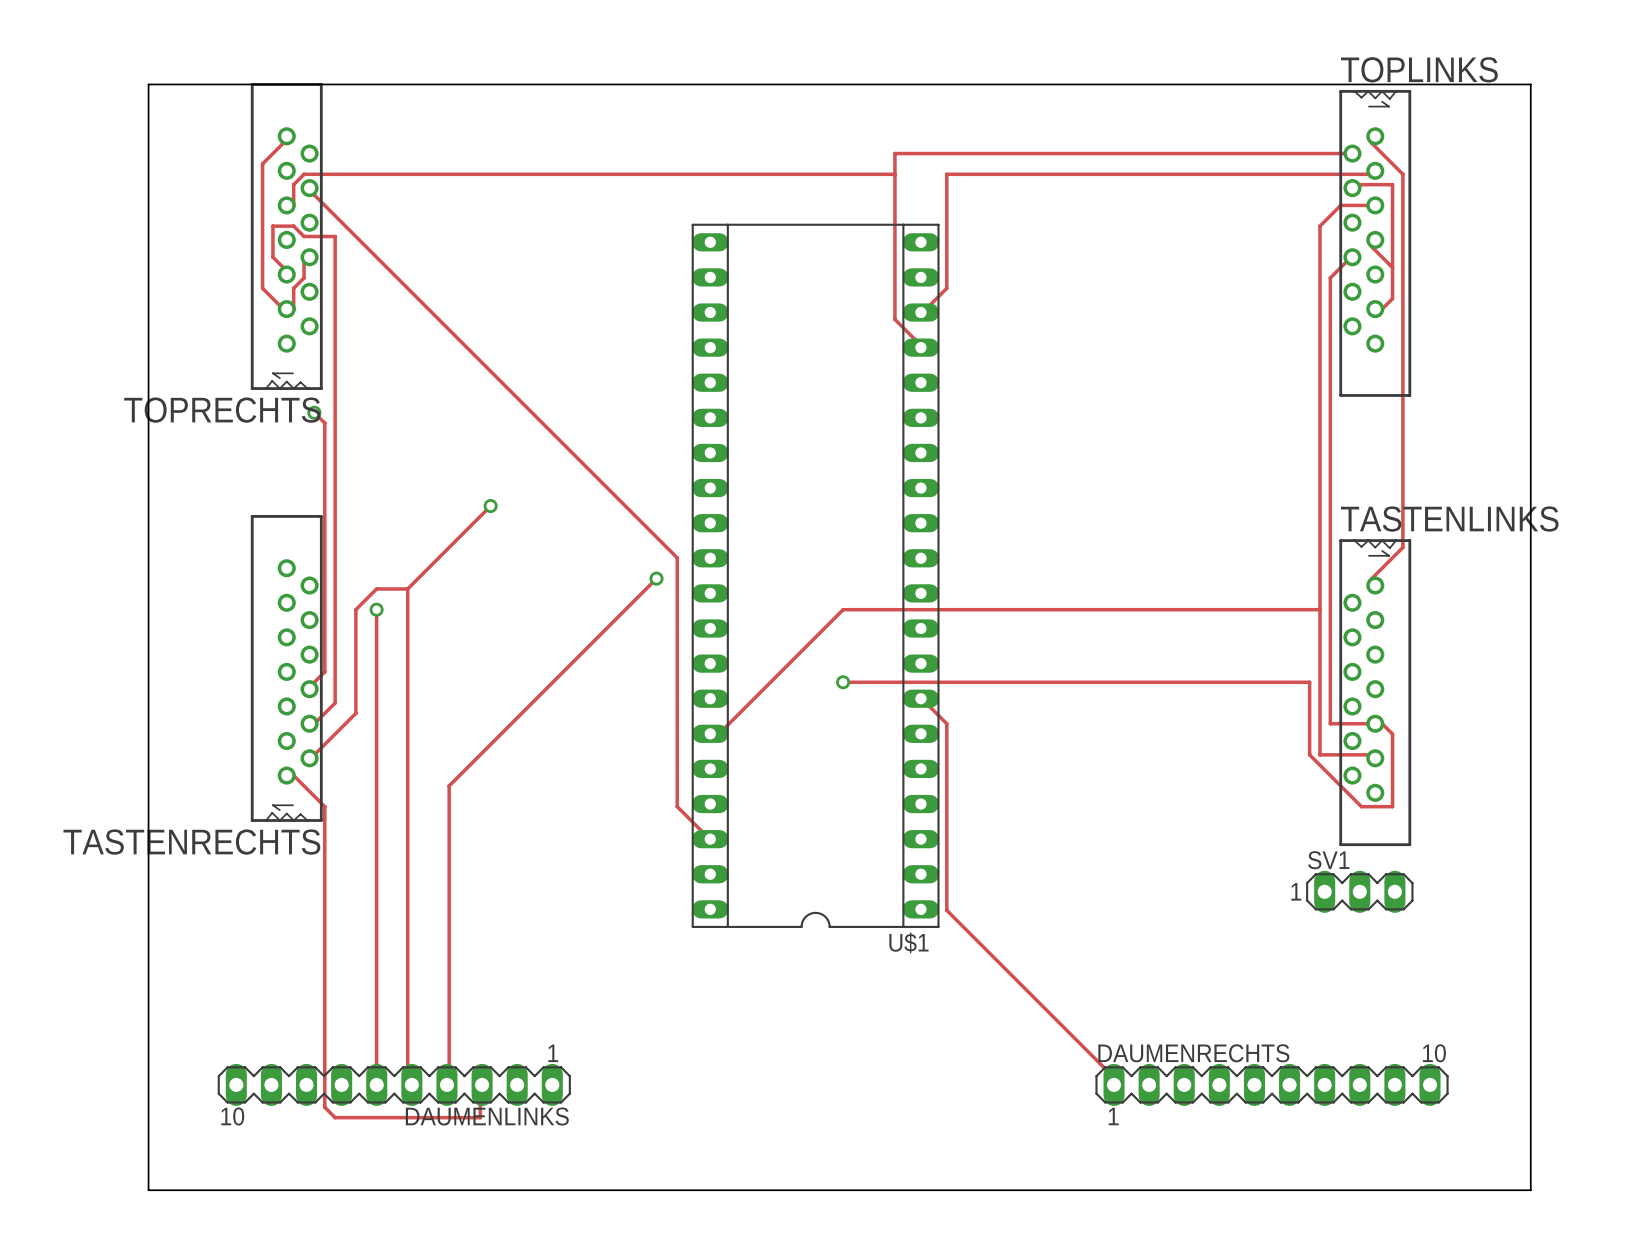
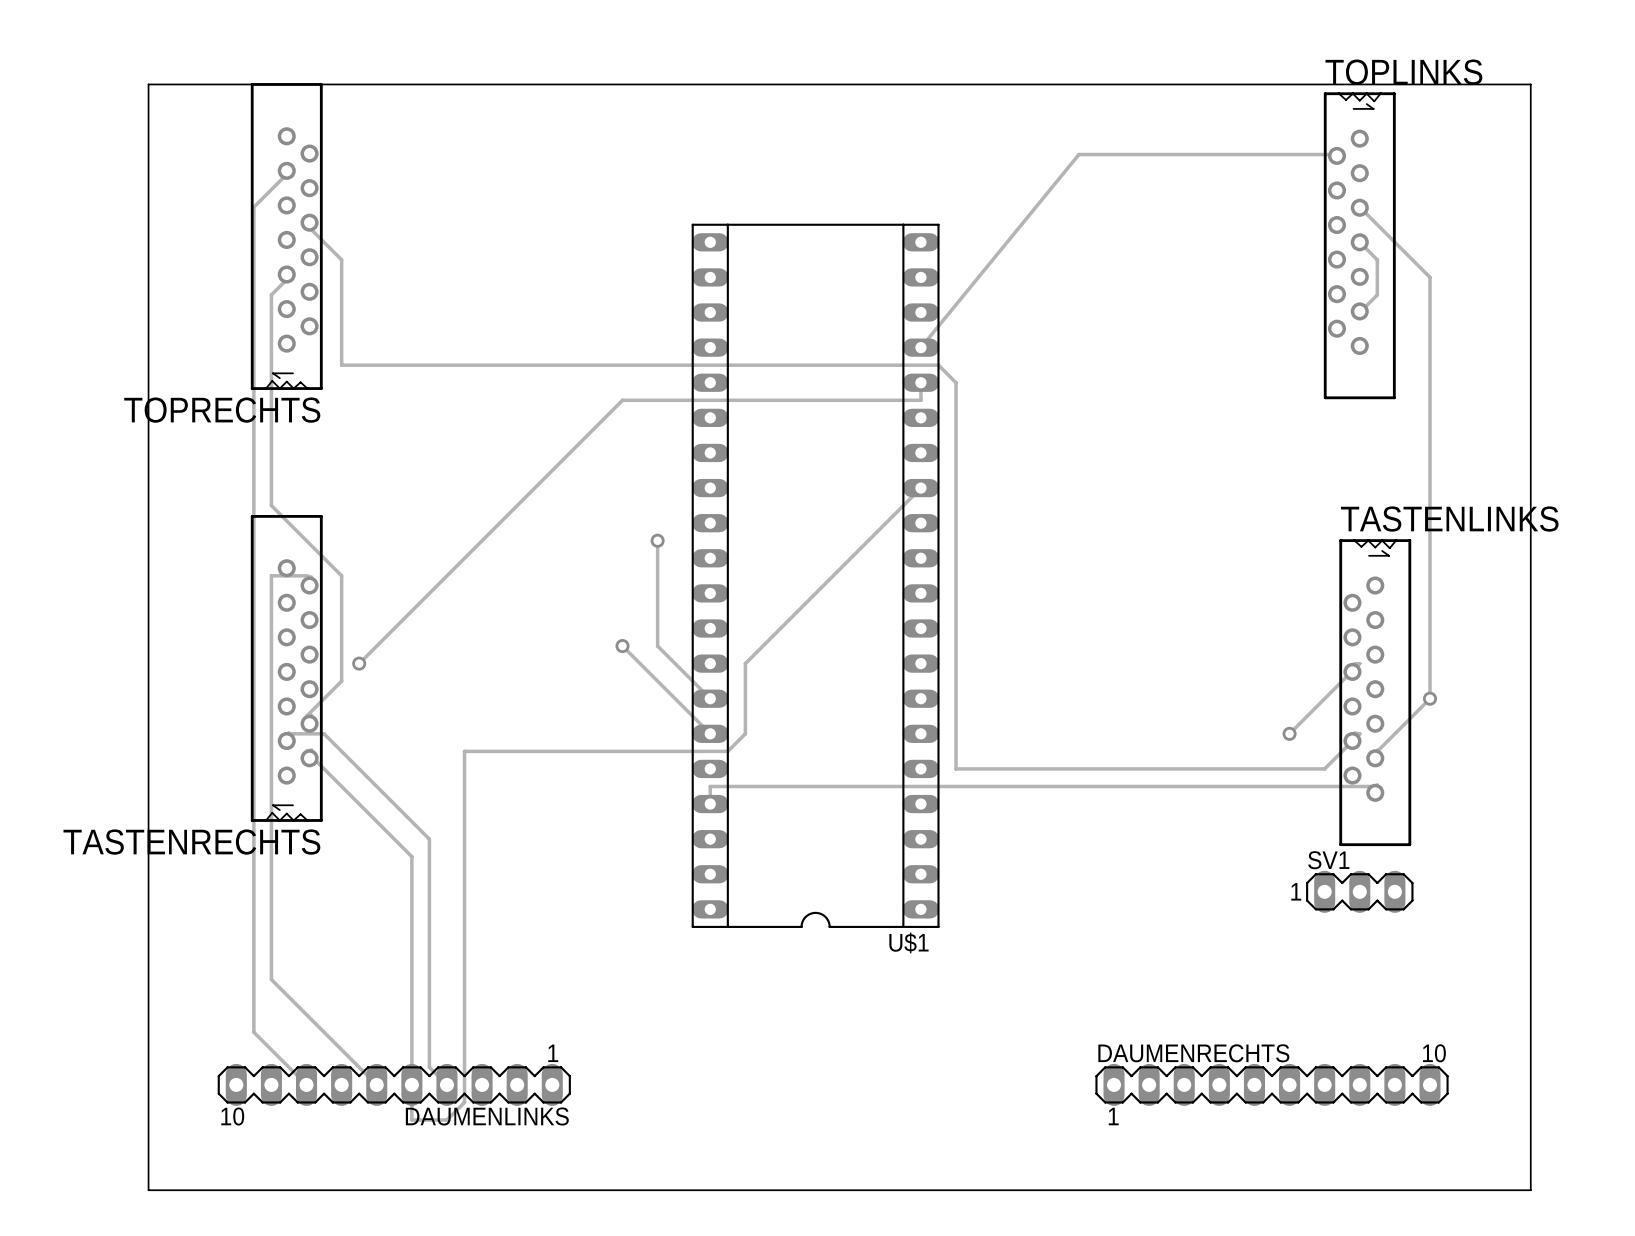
track: (286, 136) (283, 143) (262, 163) (262, 288) (283, 309) (293, 309) (293, 288) (304, 277) (304, 257) (309, 257) -> none
track: (1375, 136) (1371, 143) (1402, 174) (1402, 547) (1371, 578) (1375, 585) -> none
track: (1352, 153) (894, 153) (894, 319) (920, 347) -> (1336, 155) (1342, 154) (1078, 154) (920, 347)
track: (1375, 170) (1371, 174) (946, 174) (946, 288) (920, 312) -> none
track: none -> (288, 173) (253, 207) (253, 1032) (306, 1084)
track: (894, 174) (304, 174) (293, 184) (293, 205) (286, 205) -> none
track: (309, 188) (677, 557) (677, 806) (710, 839) -> none
track: (1352, 188) (1361, 184) (1392, 184) (1392, 298) (1382, 309) (1375, 309) -> none
track: (1375, 205) (1340, 205) (1319, 226) (1319, 754) (1371, 754) (1375, 758) -> none
track: none -> (1359, 207) (1430, 277) (1430, 698) (1377, 750)
track: none -> (311, 225) (306, 224) (341, 259) (341, 365) (938, 365) (956, 382) (956, 768) (1324, 768) (1359, 733) (1354, 733)
track: (1375, 239) (1371, 246) (1392, 267) -> none
track: none -> (1359, 242) (1377, 259) (1377, 294) (1359, 311)
TOPLINKS position: (1375, 243) -> (1359, 245)
track: (1352, 257) (1330, 277) (1330, 723) (1382, 723) (1392, 734) (1392, 806) (1361, 806) (1309, 754) (1309, 682) (843, 682) -> none
track: (286, 274) (283, 267) (272, 257) (272, 226) (293, 226) (304, 236) (335, 236) (335, 703) (314, 723) (309, 723) -> none
track: none -> (288, 276) (271, 294) (271, 505) (341, 575) (341, 681) (306, 716) (311, 715)
track: none -> (920, 382) (920, 400) (622, 400) (359, 663)
track: (314, 412) (324, 423) (324, 671) (309, 689) -> none
via: (314, 412) -> none
track: none -> (920, 488) (745, 663) (745, 733) (727, 751) (464, 751) (464, 1102) (446, 1120) (411, 1120) (411, 856) (306, 751) (311, 750)
track: (490, 506) (407, 588) -> none
via: (490, 506) -> none
track: none -> (657, 540) (657, 646) (710, 698)
via: none -> (657, 540)
track: (656, 578) (449, 785) (449, 1076) (446, 1084) -> (288, 732) (324, 733) (429, 839) (429, 1067) (446, 1084)
via: (656, 578) -> none
track: (407, 588) (376, 588) (355, 609) (355, 713) (309, 758) -> none
track: (407, 588) (407, 1076) (411, 1084) -> none
track: (376, 609) (376, 1084) -> (311, 577) (271, 575) (271, 979) (376, 1084)
via position: (376, 609) -> (359, 663)
track: (1319, 609) (843, 609) (718, 734) (710, 733) -> (622, 646) (710, 733)
via: none -> (622, 646)
track: none -> (1354, 663) (1359, 663) (1289, 733)
via: (843, 682) -> none
track: (920, 698) (946, 723) (946, 910) (1112, 1076) (1114, 1084) -> none
via: none -> (1430, 698)
via: none -> (1289, 733)
track: (286, 775) (293, 775) (324, 806) (324, 1107) (335, 1117) (480, 1117) (480, 1086) (482, 1084) -> none
track: none -> (1377, 784) (1377, 786) (710, 786) (710, 804)

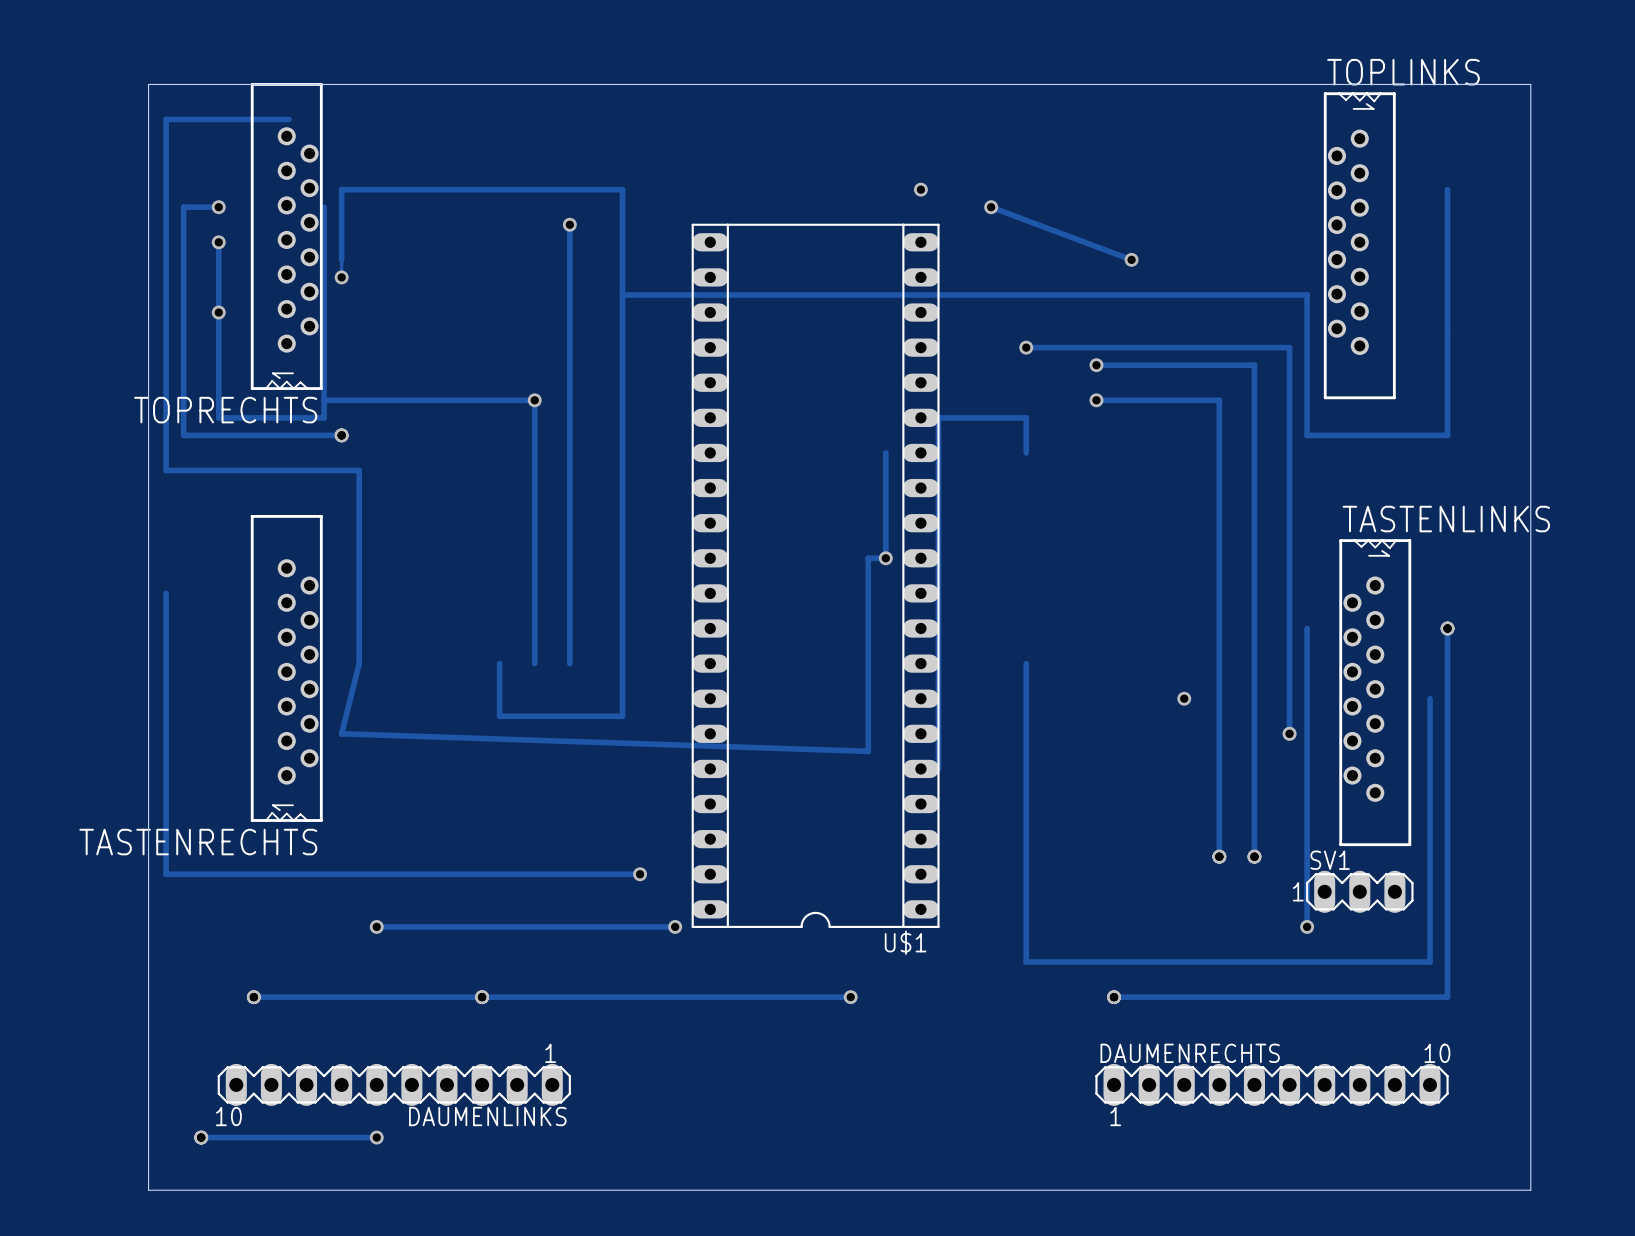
track: none -> (288, 119) (166, 119) (166, 470) (359, 470) (359, 663) (341, 733) (868, 751) (868, 558) (885, 558) (885, 452)
track: (1336, 155) (1342, 154) (1078, 154) (920, 347) -> none
track: (288, 173) (253, 207) (253, 1032) (306, 1084) -> none
via: none -> (920, 189)
track: none -> (1447, 189) (1447, 435) (1307, 435) (1307, 294) (622, 294)
track: none -> (218, 207) (183, 207) (183, 435) (341, 435)
via: none -> (218, 207)
track: none -> (324, 207) (324, 417) (218, 417) (218, 242)
track: none -> (991, 207) (1131, 259)
via: none -> (991, 207)
track: (1359, 207) (1430, 277) (1430, 698) (1377, 750) -> none
track: none -> (569, 224) (569, 663)
via: none -> (569, 224)
track: (311, 225) (306, 224) (341, 259) -> (499, 663) (499, 716) (622, 716) (622, 189) (341, 189) (341, 259)
via: none -> (218, 242)
track: (1359, 242) (1377, 259) (1377, 294) (1359, 311) -> none
via: none -> (1131, 259)
track: (288, 276) (271, 294) (271, 505) (341, 575) (341, 681) (306, 716) (311, 715) -> none
track: (341, 277) (341, 365) (938, 365) (956, 382) (956, 768) (1324, 768) (1359, 733) (1354, 733) -> none
via: none -> (341, 277)
via: none -> (218, 312)
via: none -> (1026, 347)
track: none -> (1096, 365) (1254, 365) (1254, 856)
via: none -> (1096, 365)
track: (920, 382) (920, 400) (622, 400) (359, 663) -> none
track: none -> (324, 400) (534, 400) (534, 663)
via: none -> (534, 400)
track: none -> (1096, 400) (1219, 400) (1219, 856)
via: none -> (1096, 400)
via: none -> (341, 435)
track: none -> (1026, 452) (1026, 417) (938, 417) (938, 768)
track: (920, 488) (745, 663) (745, 733) (727, 751) (464, 751) (464, 1102) (446, 1120) (411, 1120) (411, 856) (306, 751) (311, 750) -> none
track: (657, 540) (657, 646) (710, 698) -> none
via: (657, 540) -> none
via: none -> (885, 558)
track: (311, 577) (271, 575) (271, 979) (376, 1084) -> none
track: none -> (166, 593) (166, 874) (640, 874)
track: none -> (1307, 628) (1307, 926)
track: none -> (1447, 628) (1447, 997) (1114, 997)
via: none -> (1447, 628)
track: (622, 646) (710, 733) -> none
via: (622, 646) -> none
via: (359, 663) -> none
track: none -> (1026, 663) (1026, 962) (1430, 962) (1430, 698)
track: (1354, 663) (1359, 663) (1289, 733) -> (1026, 347) (1289, 347) (1289, 733)
via: none -> (1184, 698)
via: (1430, 698) -> none
track: (288, 732) (324, 733) (429, 839) (429, 1067) (446, 1084) -> none
track: (1377, 784) (1377, 786) (710, 786) (710, 804) -> none
via: none -> (1219, 856)
via: none -> (1254, 856)
via: none -> (640, 874)
track: none -> (376, 926) (675, 926)
via: none -> (376, 926)
via: none -> (675, 926)
via: none -> (1307, 926)
track: none -> (253, 997) (850, 997)
via: none -> (253, 997)
via: none -> (482, 997)
via: none -> (850, 997)
via: none -> (1114, 997)
track: none -> (201, 1137) (376, 1137)
via: none -> (201, 1137)
via: none -> (376, 1137)

